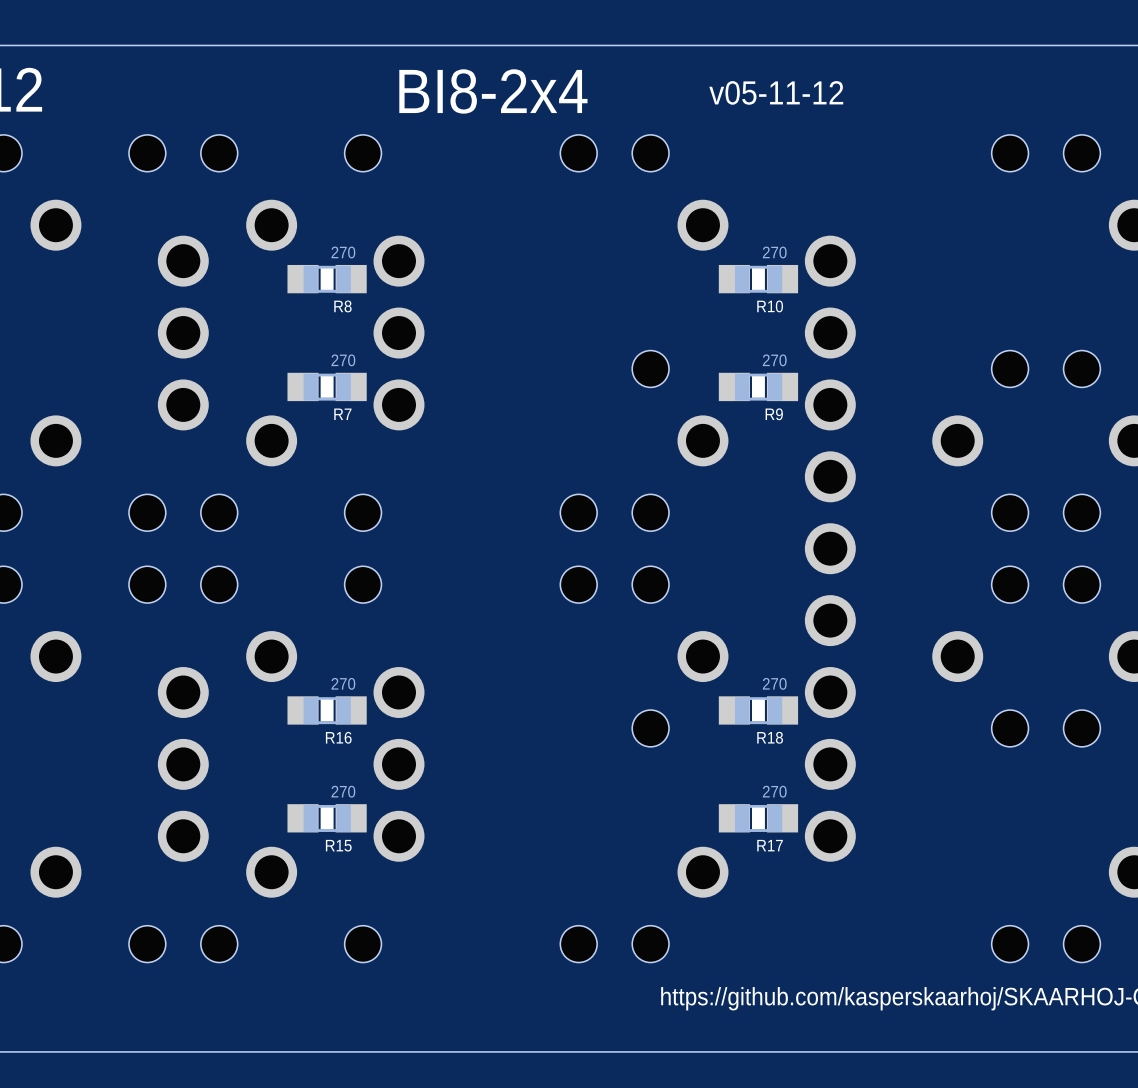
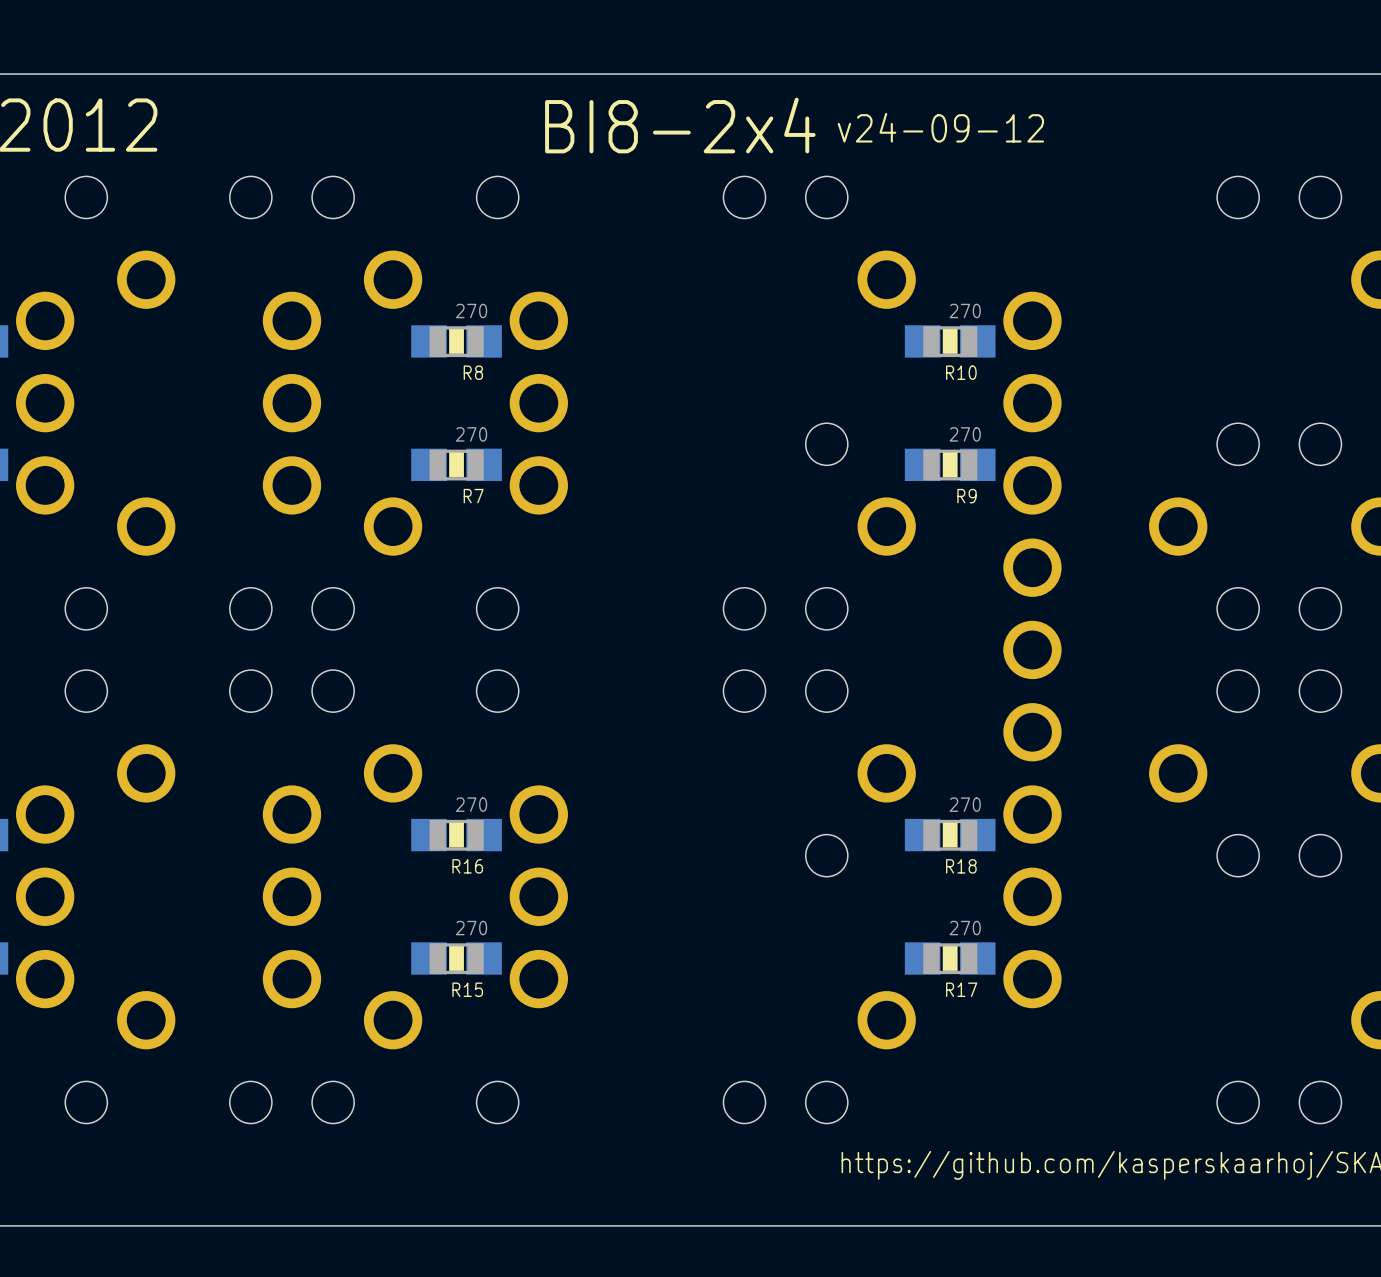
text: v05-11-12 (776, 92) -> v24-09-12 (940, 127)

